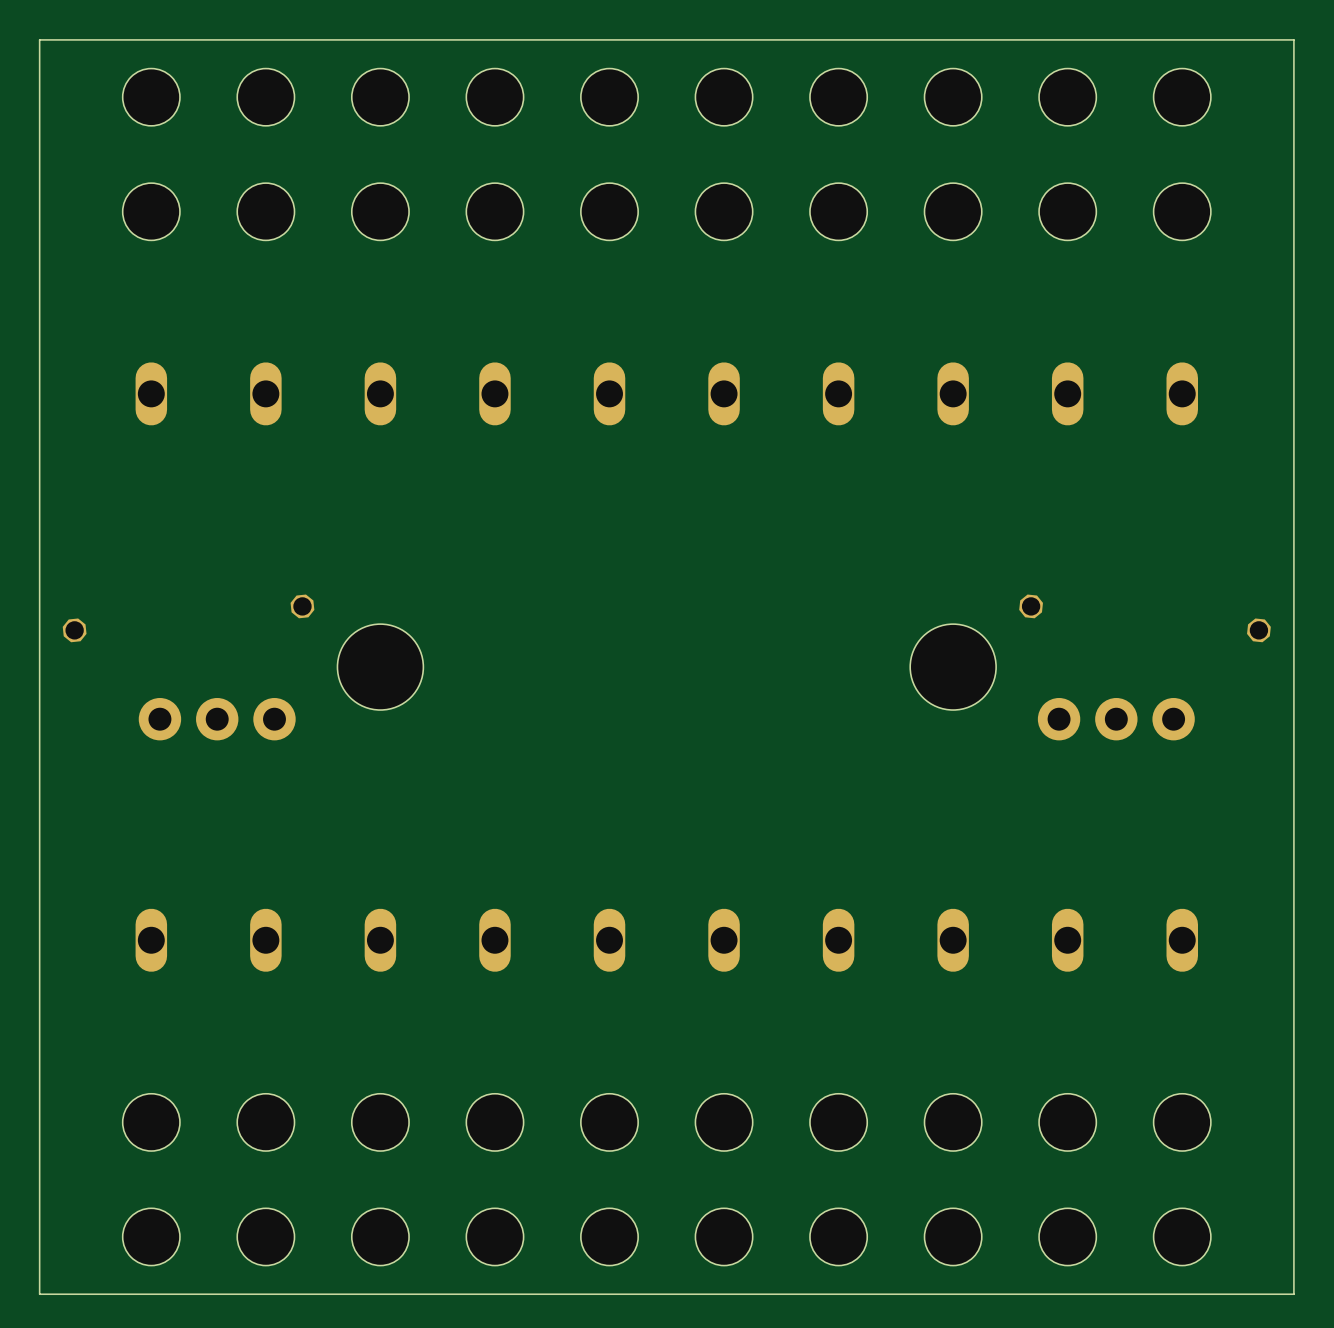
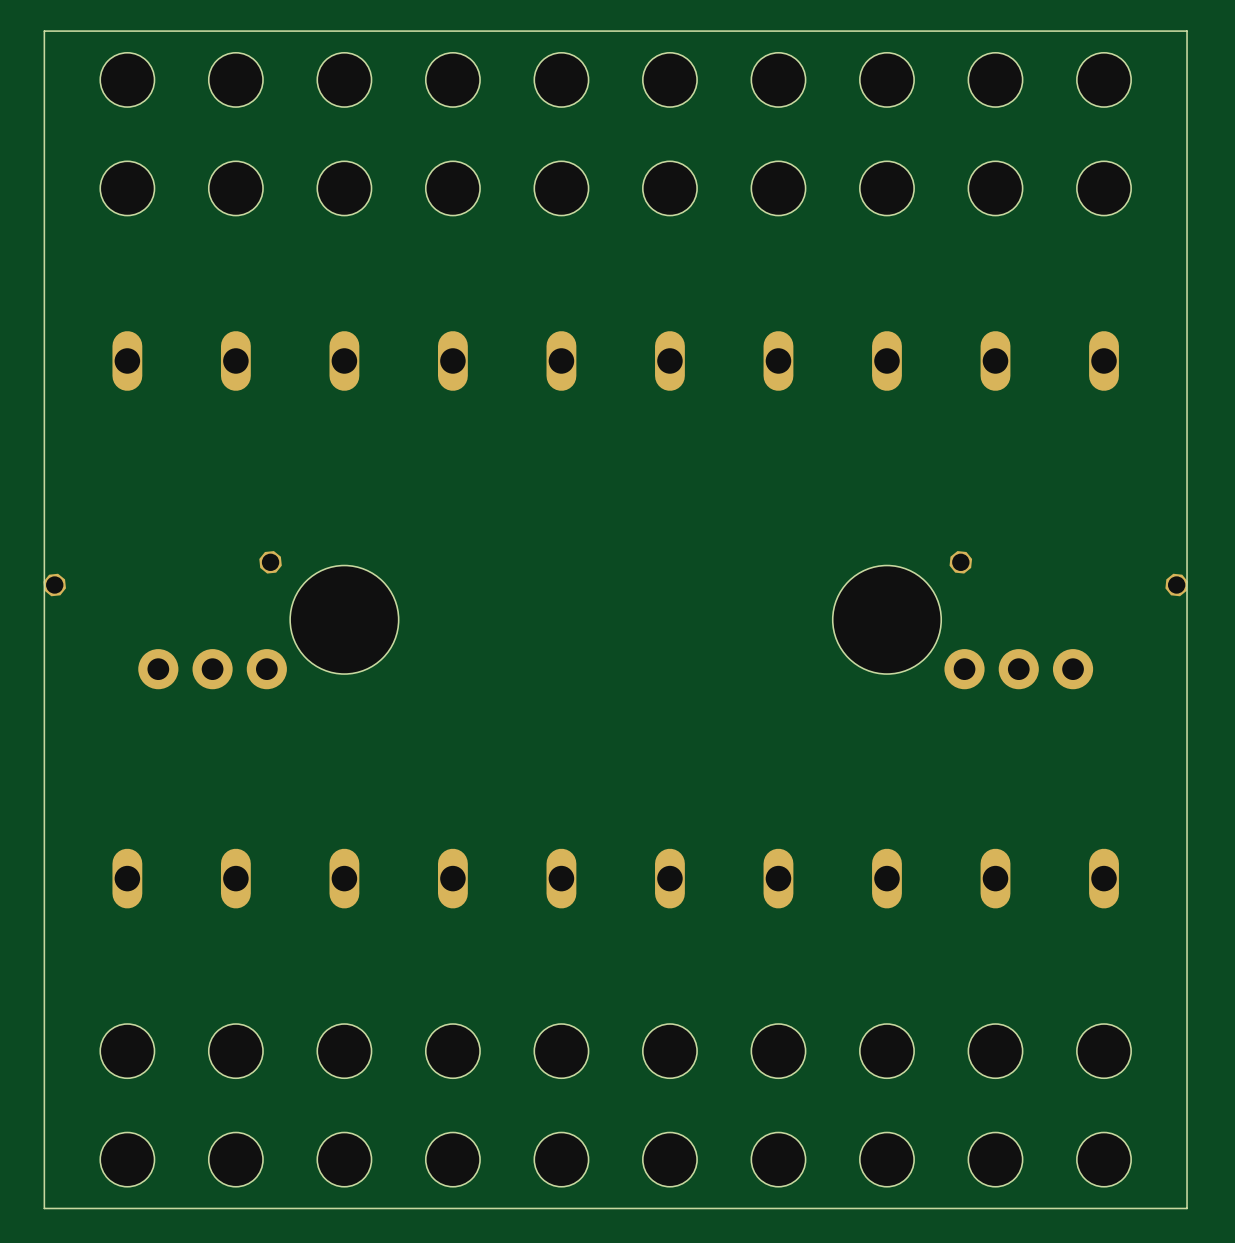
board edge: (1293, 39) (39, 39) (39, 1294) (1293, 1294) (1293, 39) -> (1187, 31) (1187, 1208) (44, 1208) (44, 31) (1187, 31)
hole size: [337, 624, 424, 711] -> [290, 565, 399, 675]
hole size: [910, 624, 997, 711] -> [832, 565, 942, 675]
part position: (217, 719) -> (212, 669)
part position: (1116, 719) -> (1018, 669)

